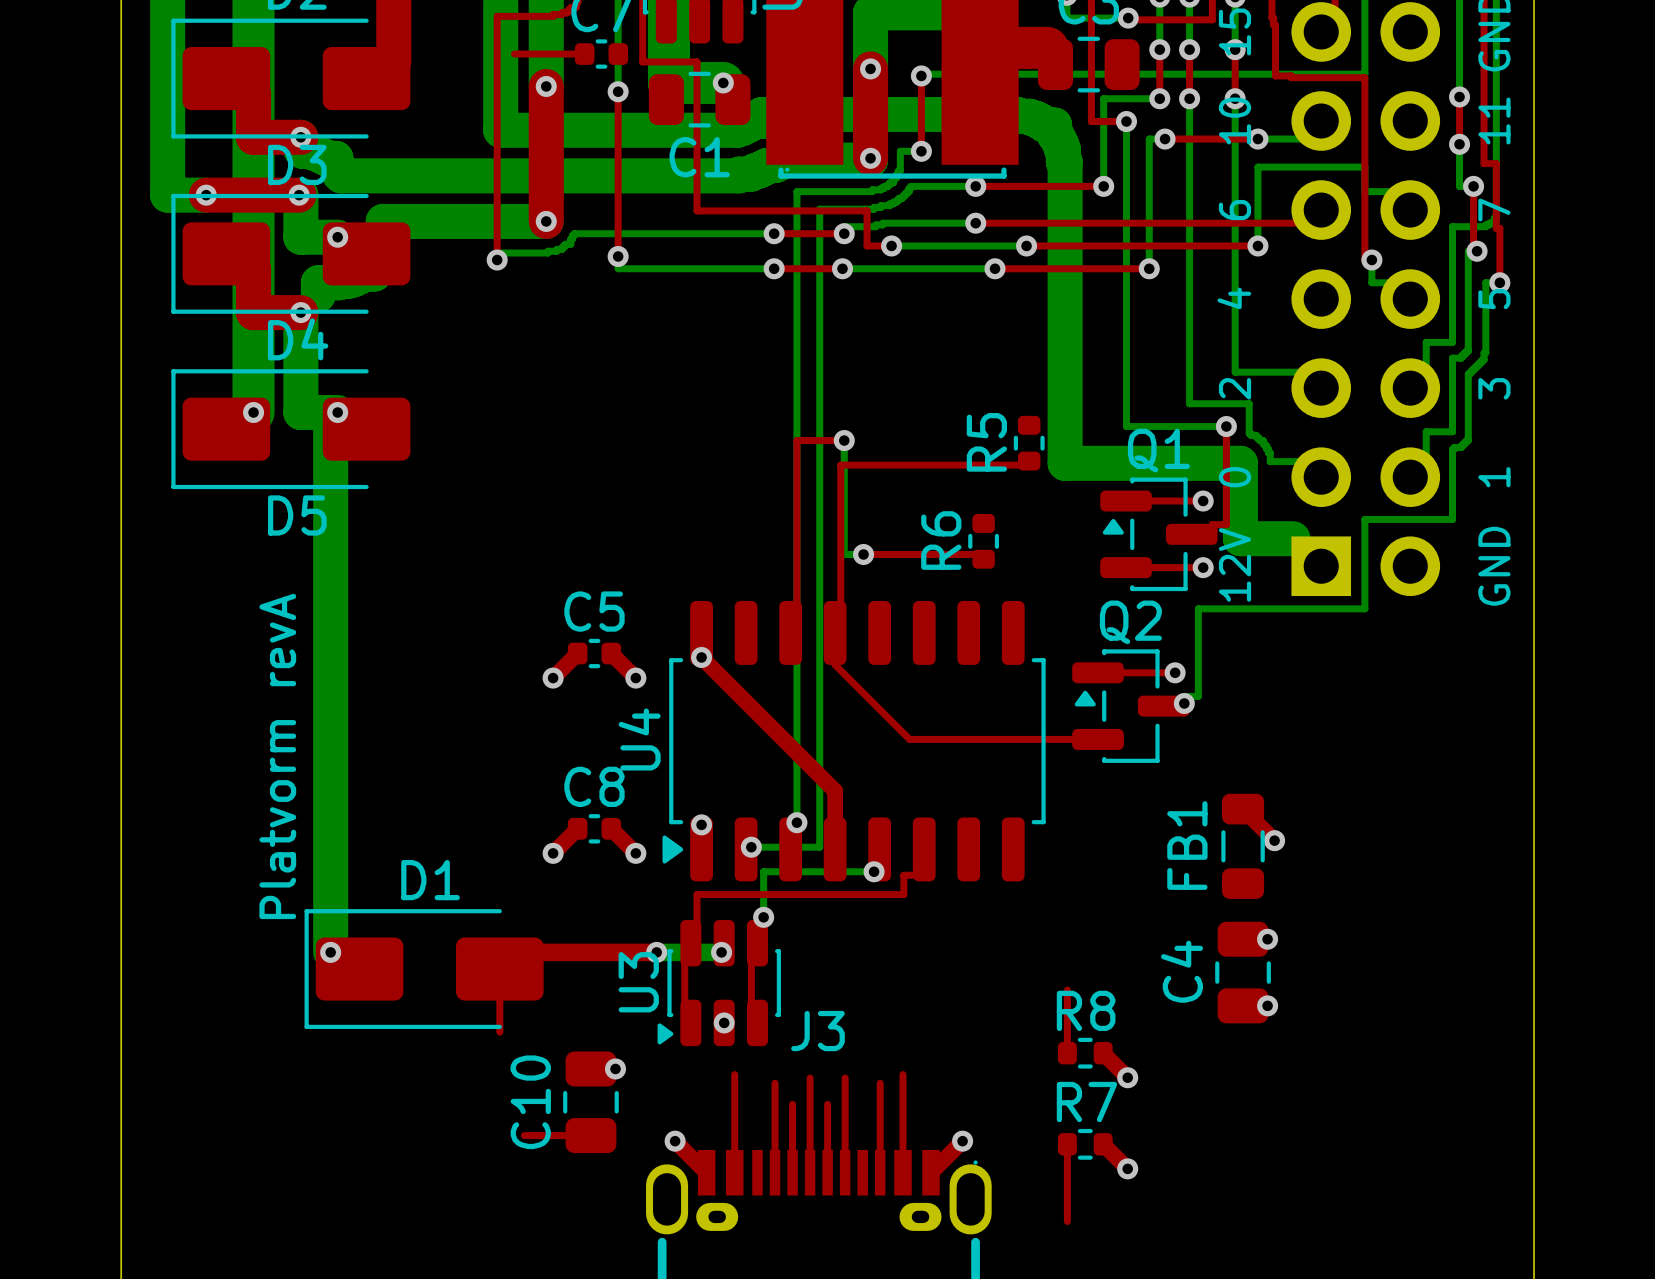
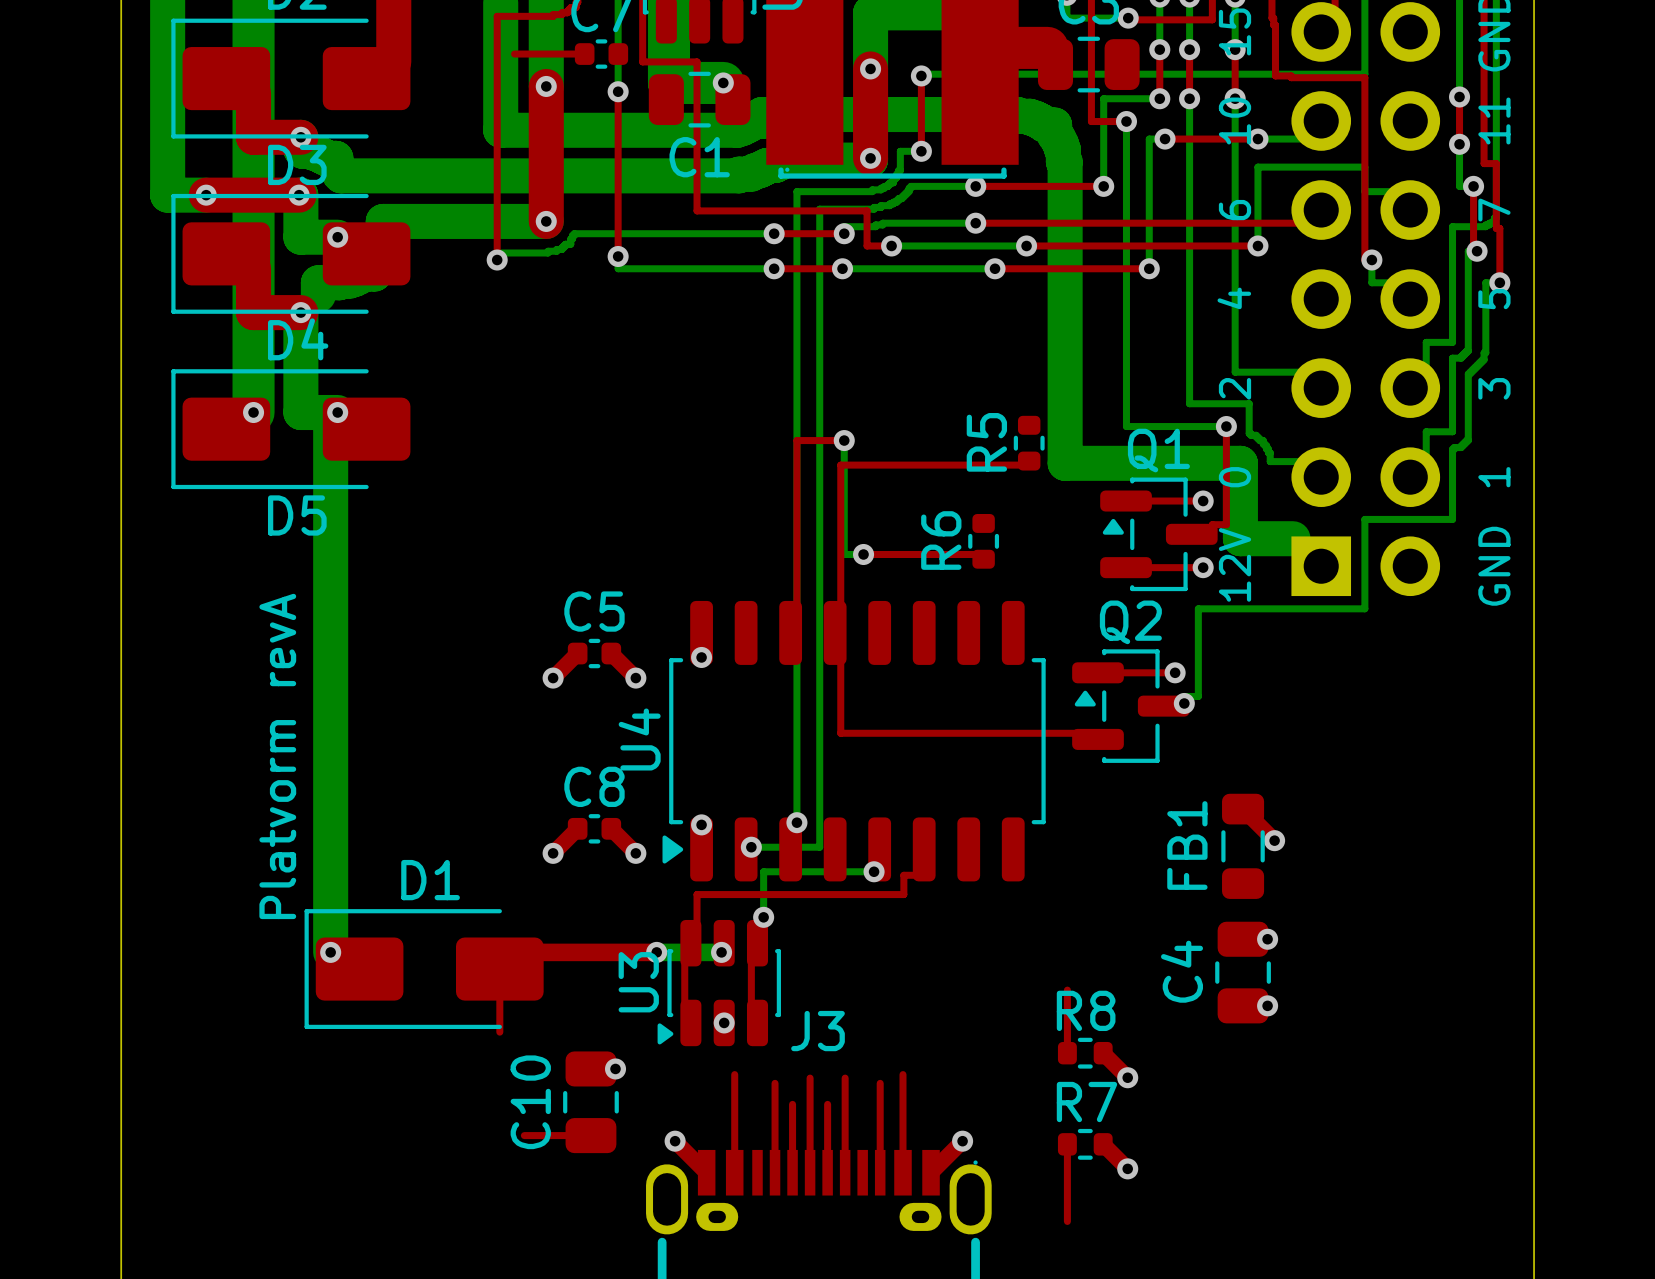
top track: (835, 632) (835, 664) (909, 739) (1098, 739) -> none
top track: (701, 657) (835, 791) (835, 849) -> none
top track: none -> (840, 659) (840, 733) (1077, 733)

